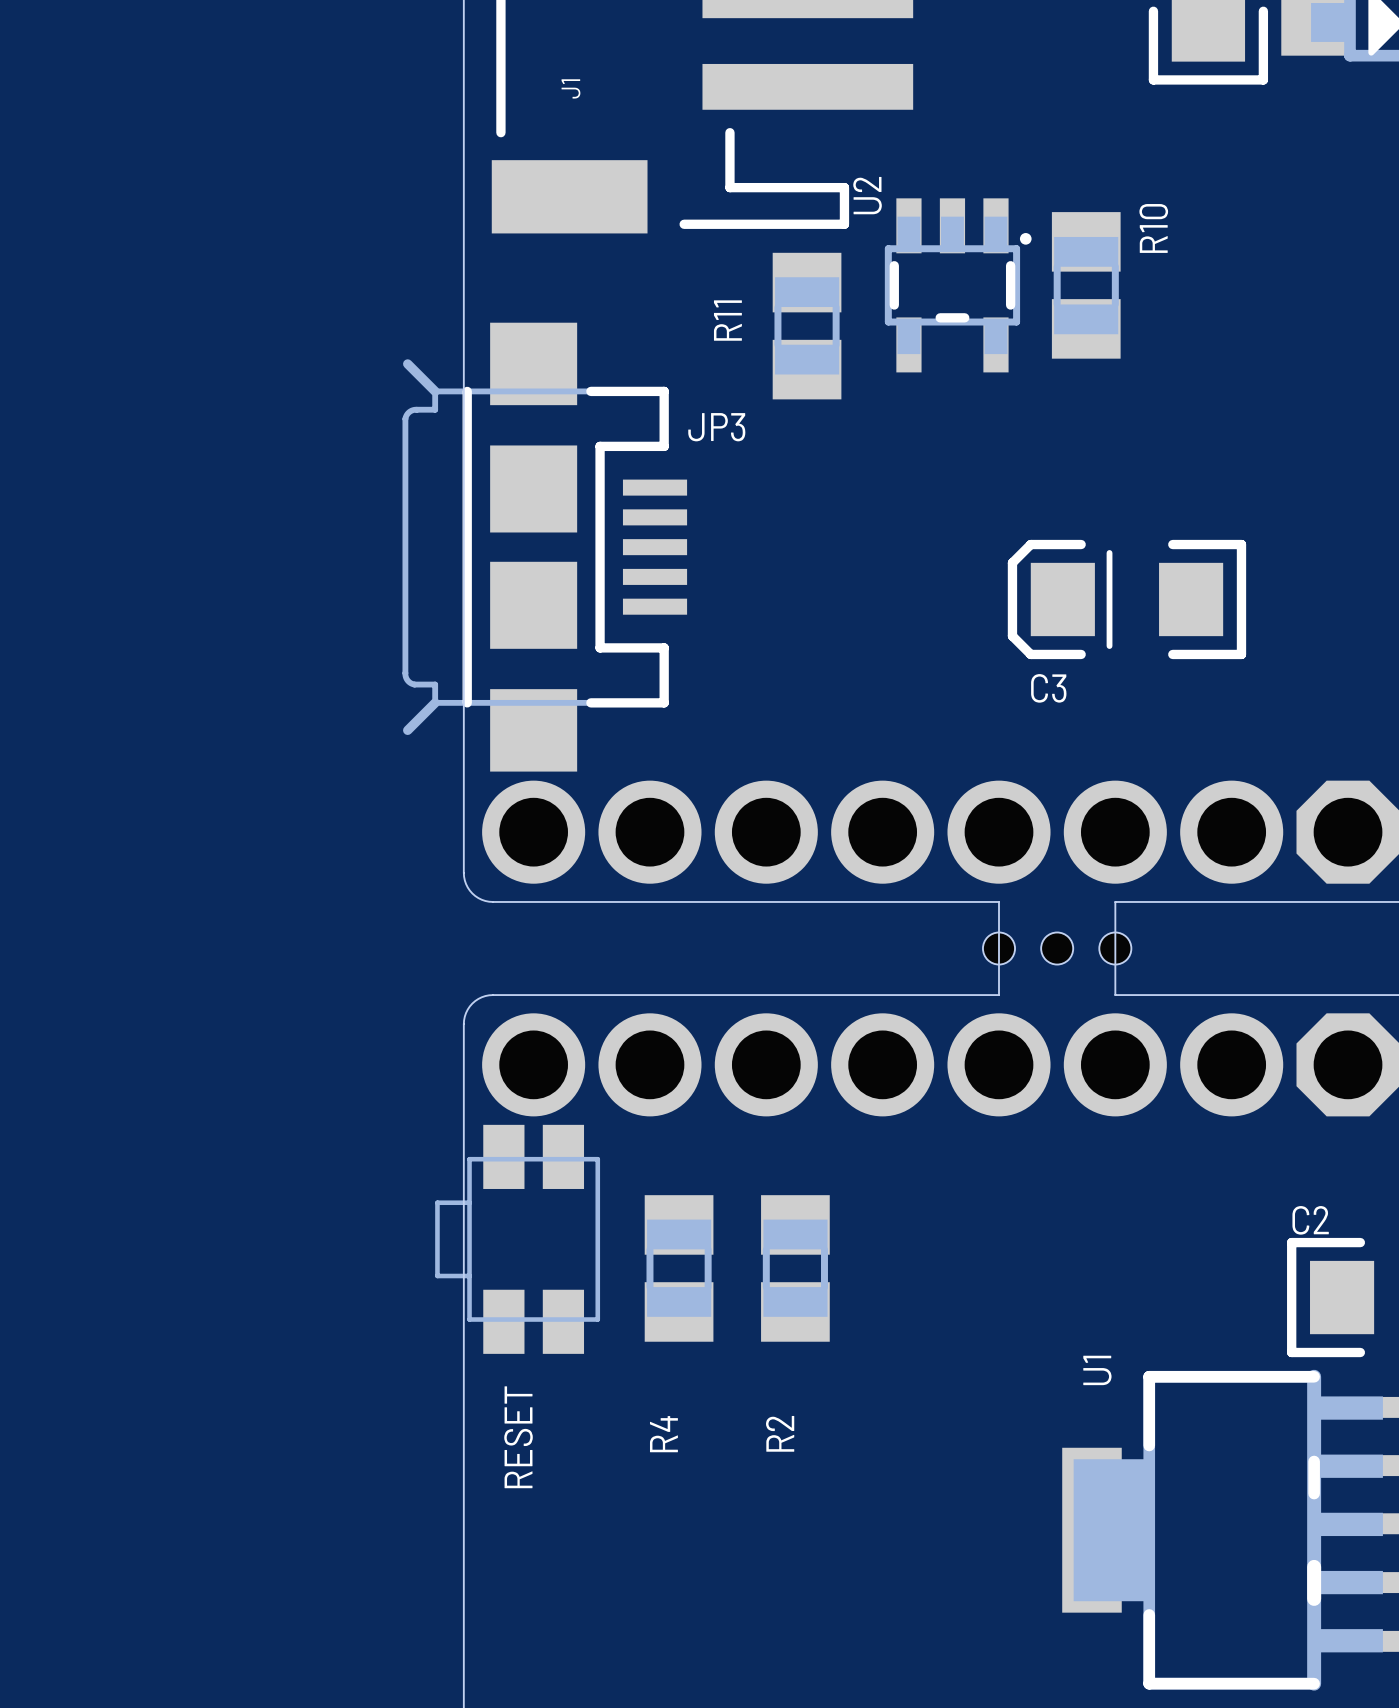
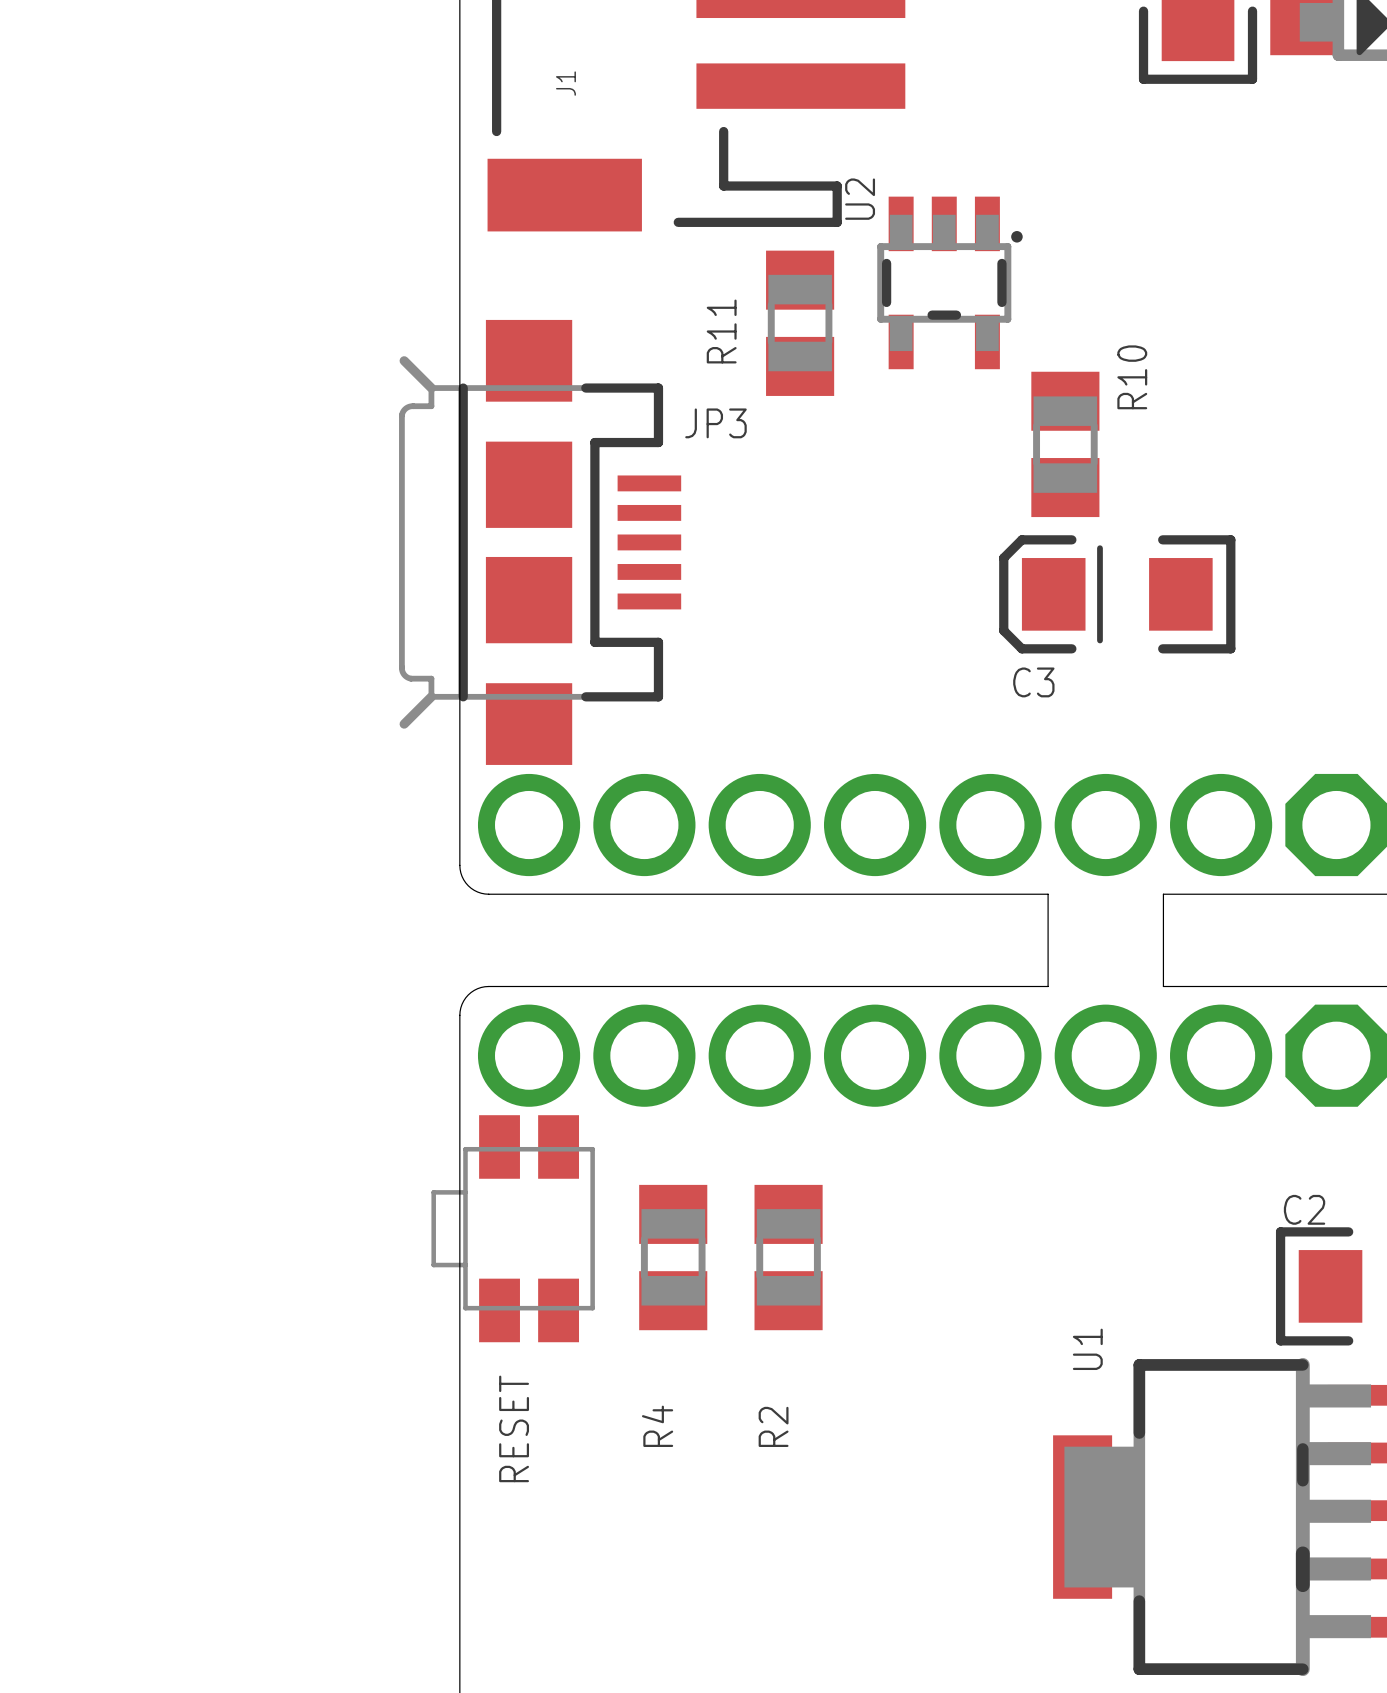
R10 position: (1086, 285) -> (1065, 444)
board edge: (999, 901) (999, 995) -> (990, 894) (1048, 894) (1048, 986) (990, 986)
board edge: (1173, 901) (1115, 901) (1115, 995) (1173, 995) -> (1163, 894) (1163, 986)
hole: (999, 948) -> none
hole: (1057, 948) -> none
hole: (1115, 948) -> none

